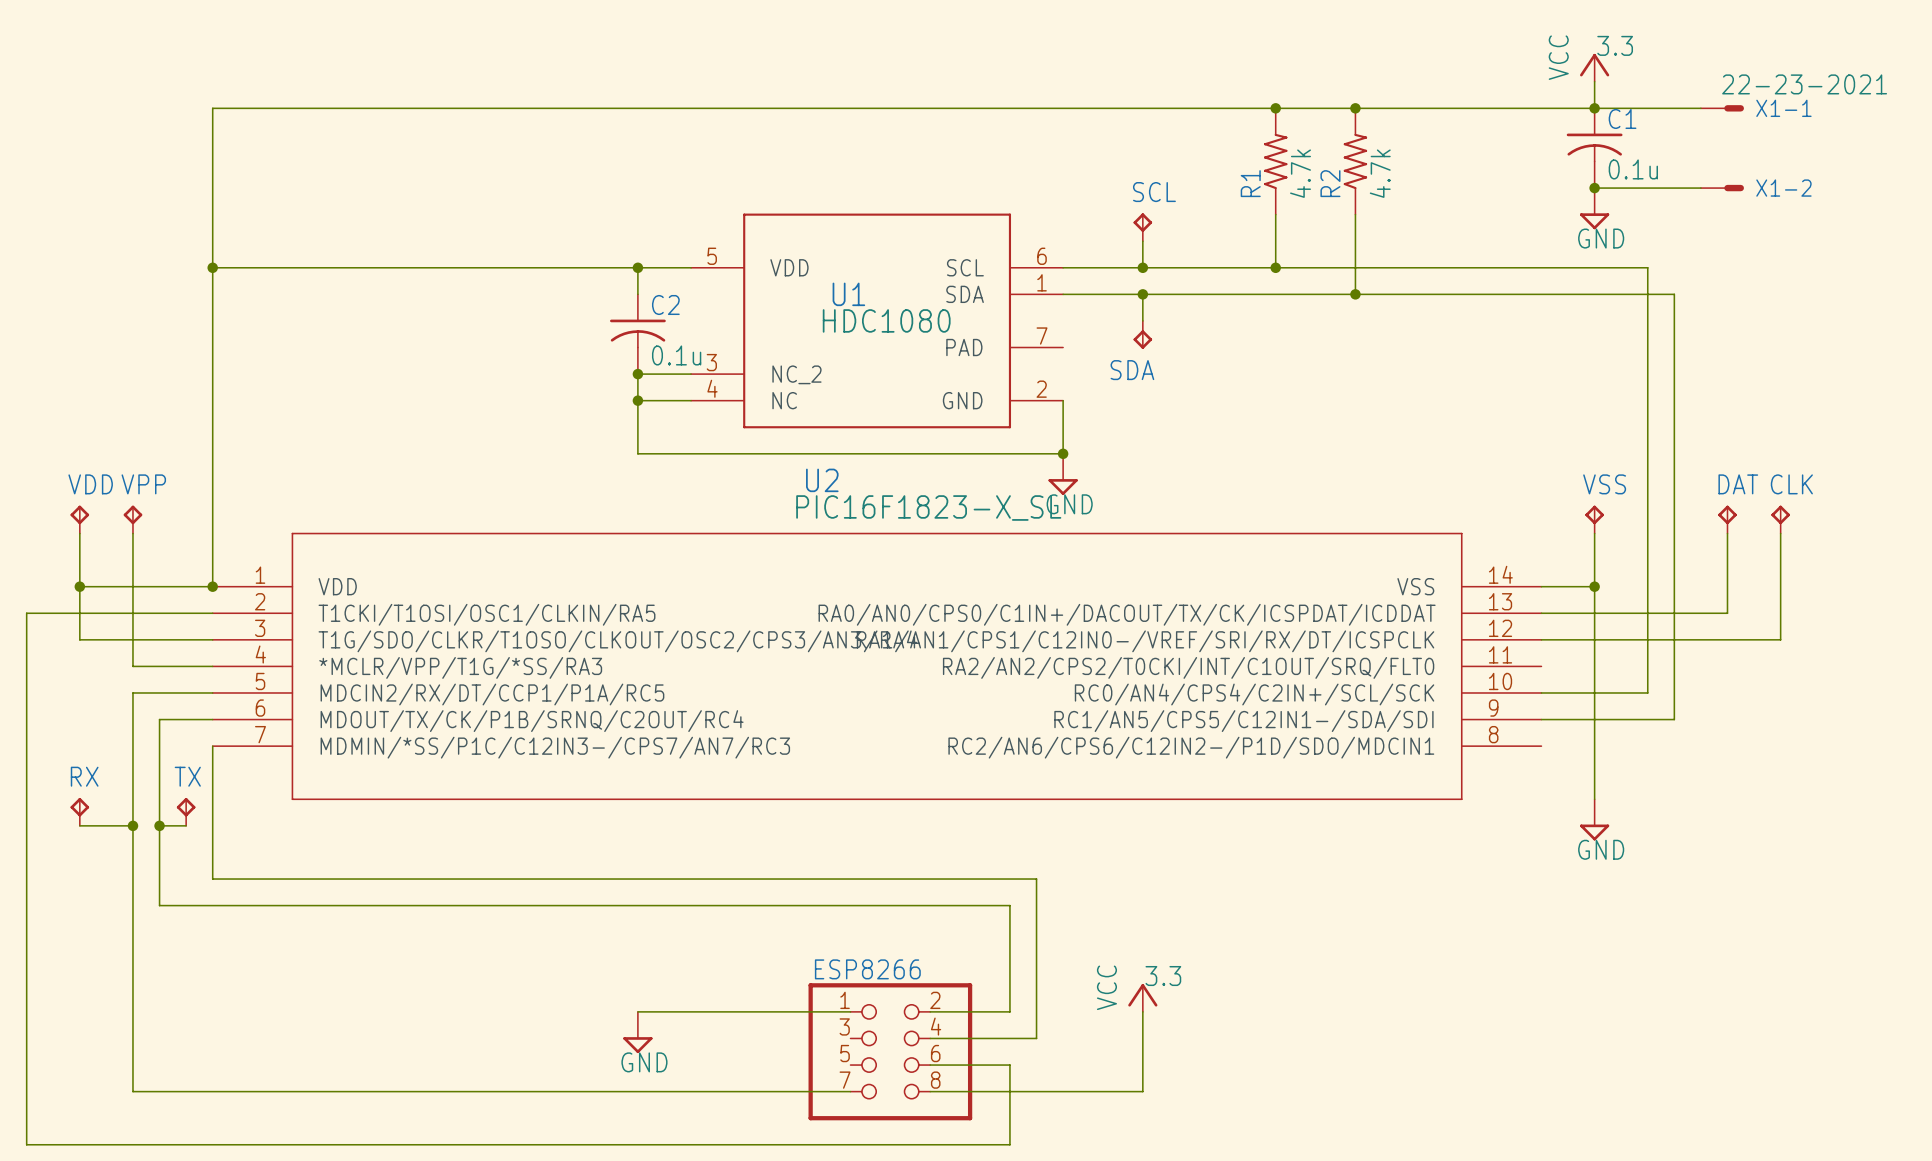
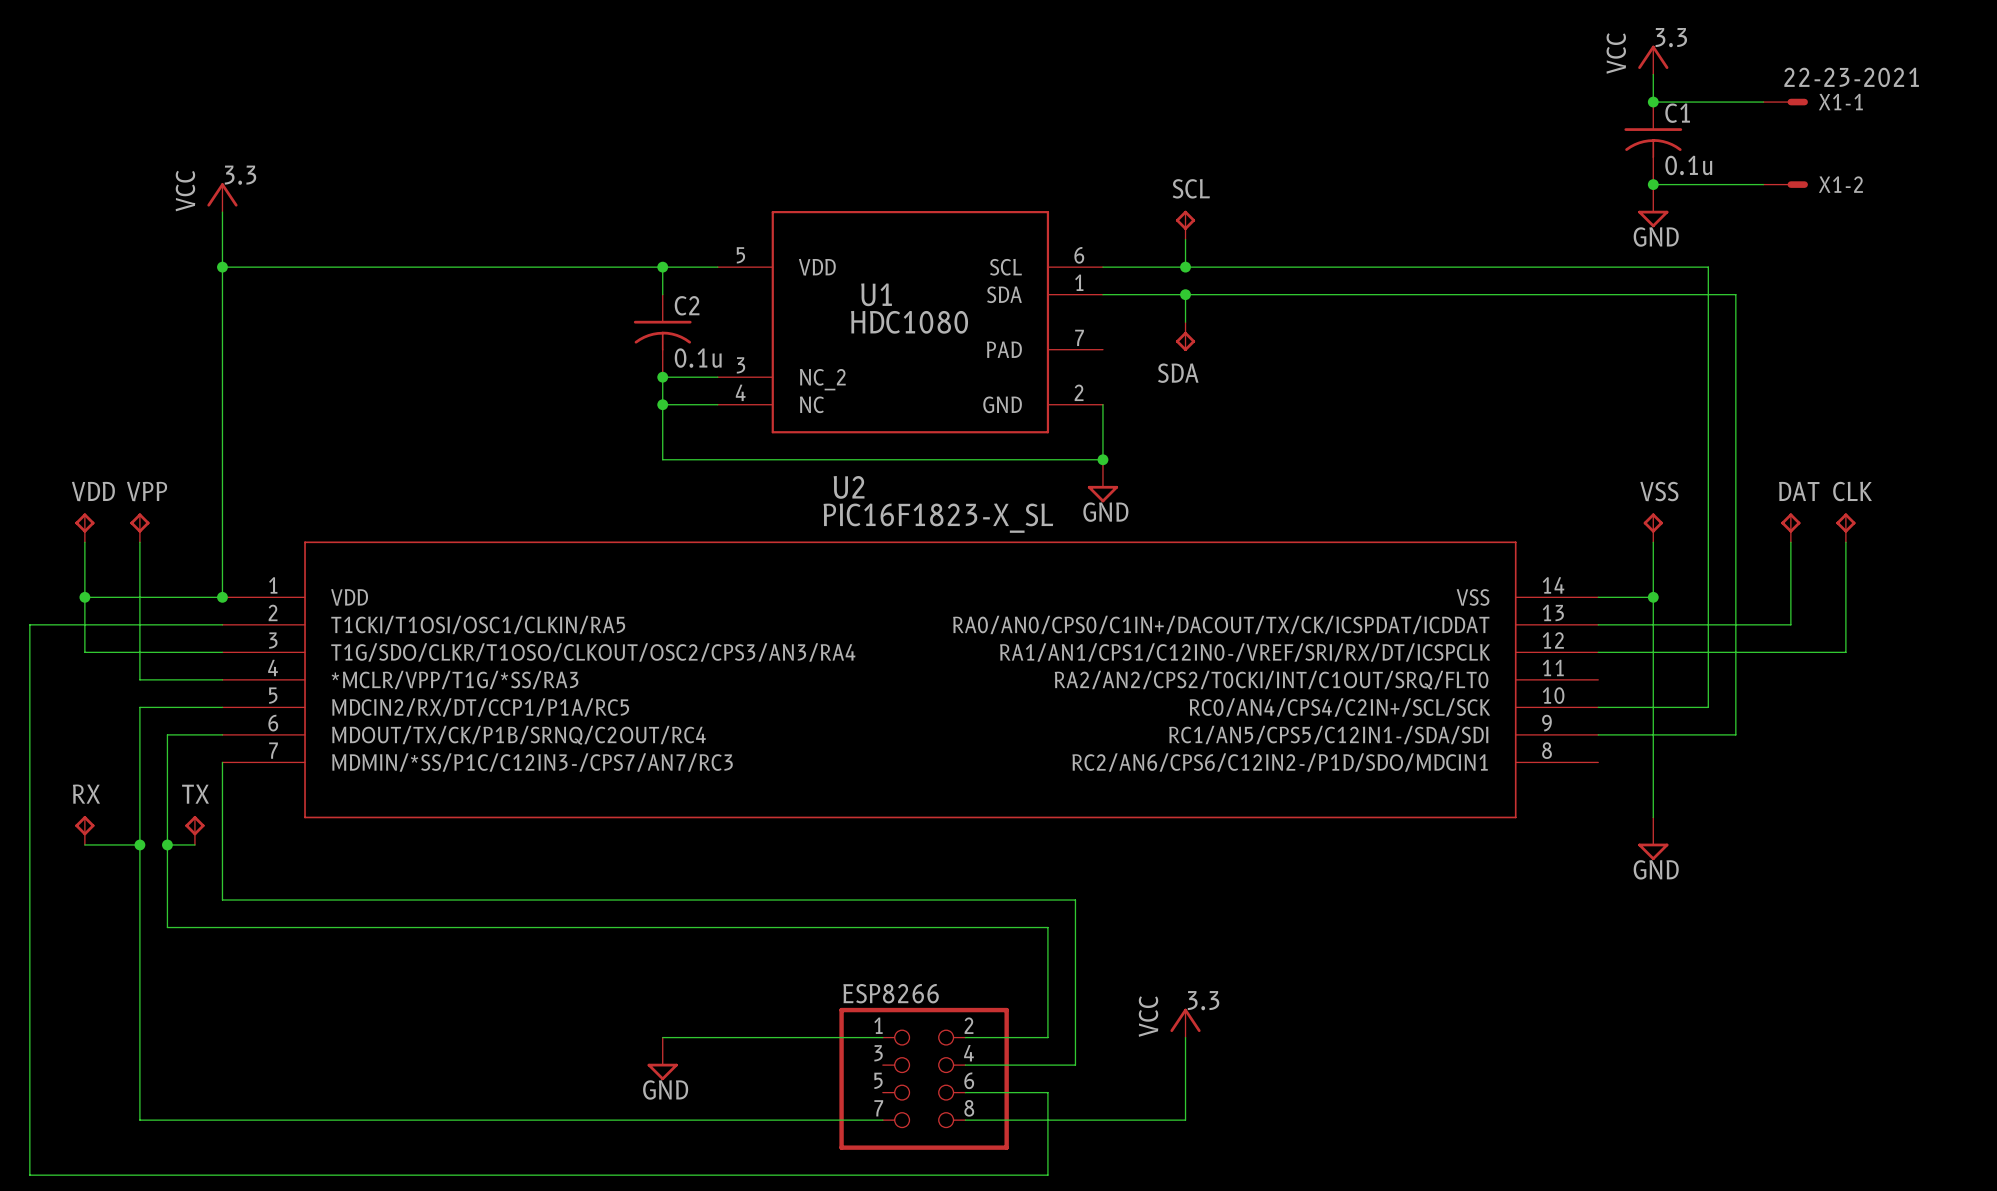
junction: (1275, 108) -> none
junction: (1355, 108) -> none
wire: (1594, 108) (212, 108) (212, 214) -> none
R1: 4.7k (1275, 161) -> none
R2: 4.7k (1355, 161) -> none
power symbol: none -> VCC (222, 197)
wire: (1275, 214) (1275, 267) -> none
wire: (1355, 214) (1355, 294) -> none
junction: (1275, 267) -> none
junction: (1355, 294) -> none

